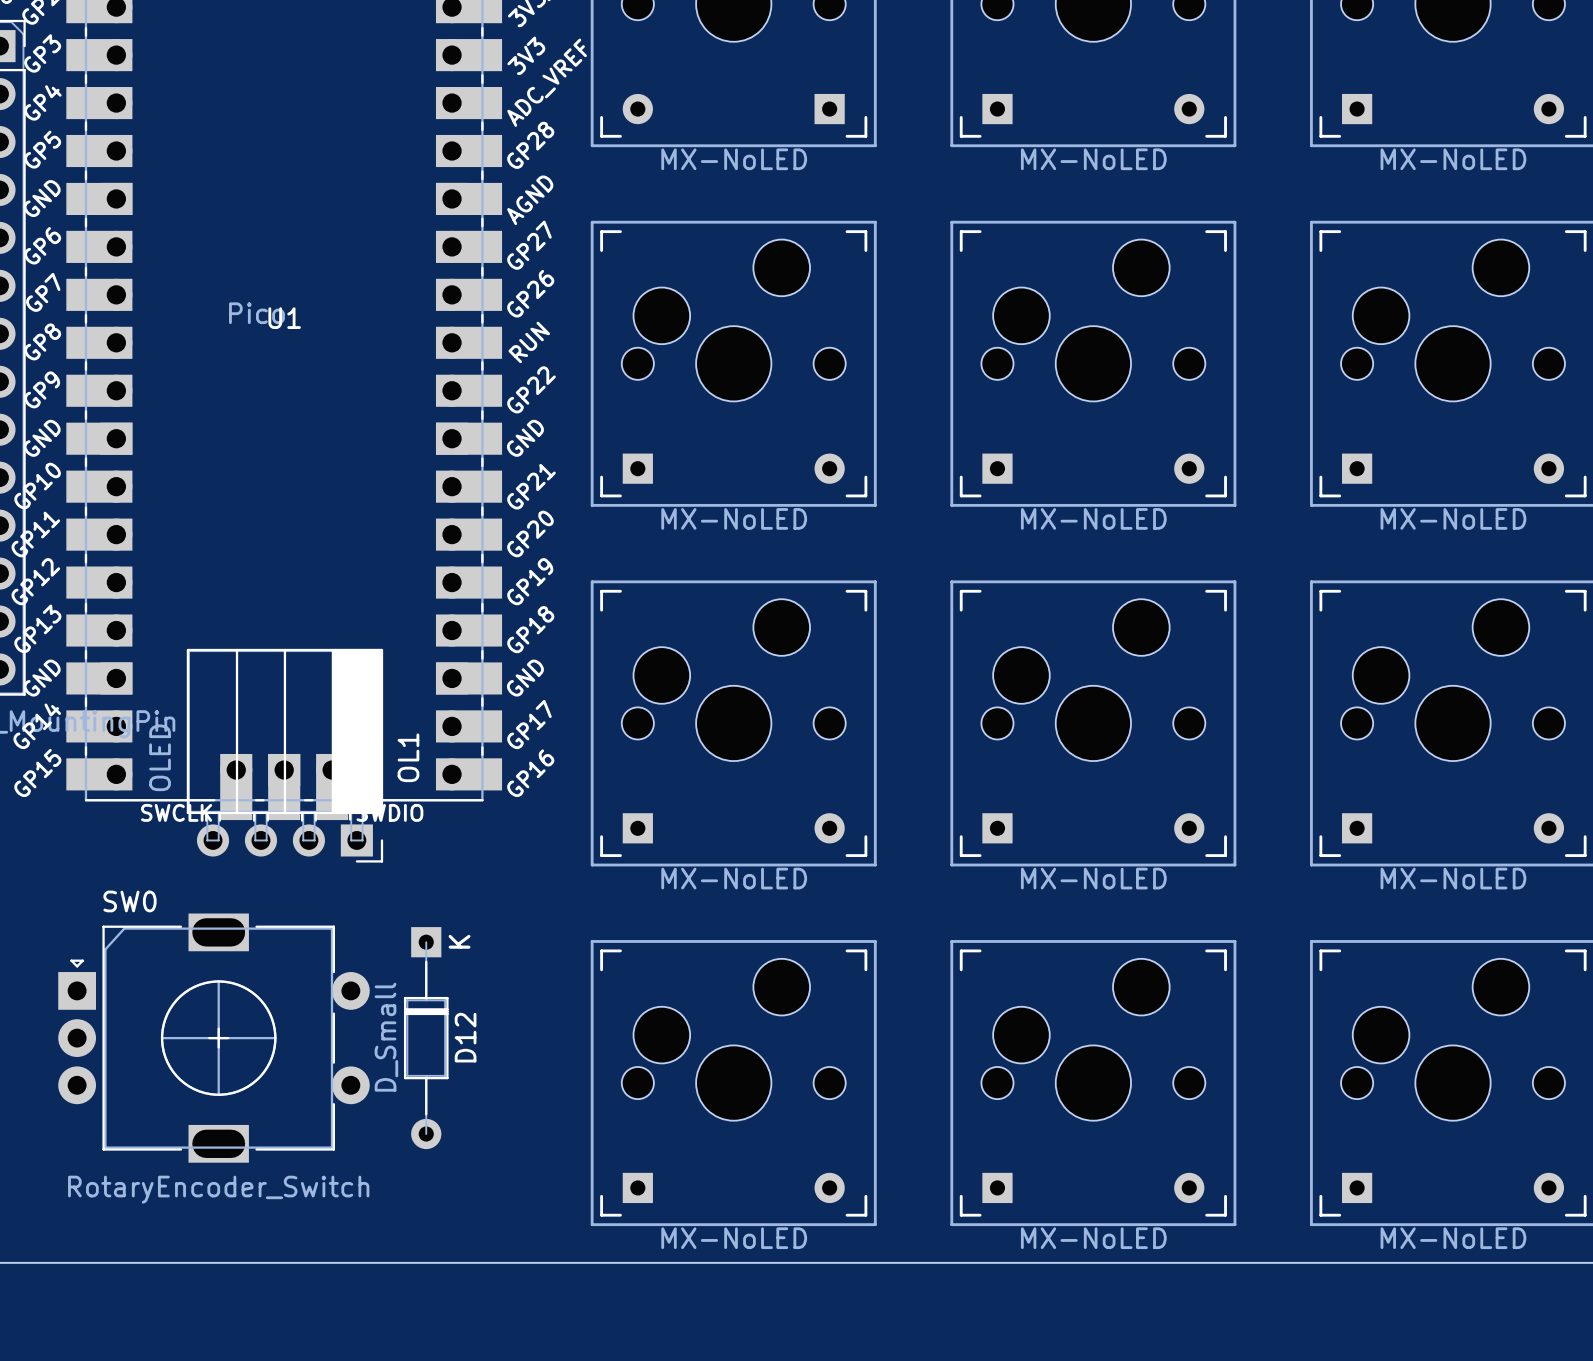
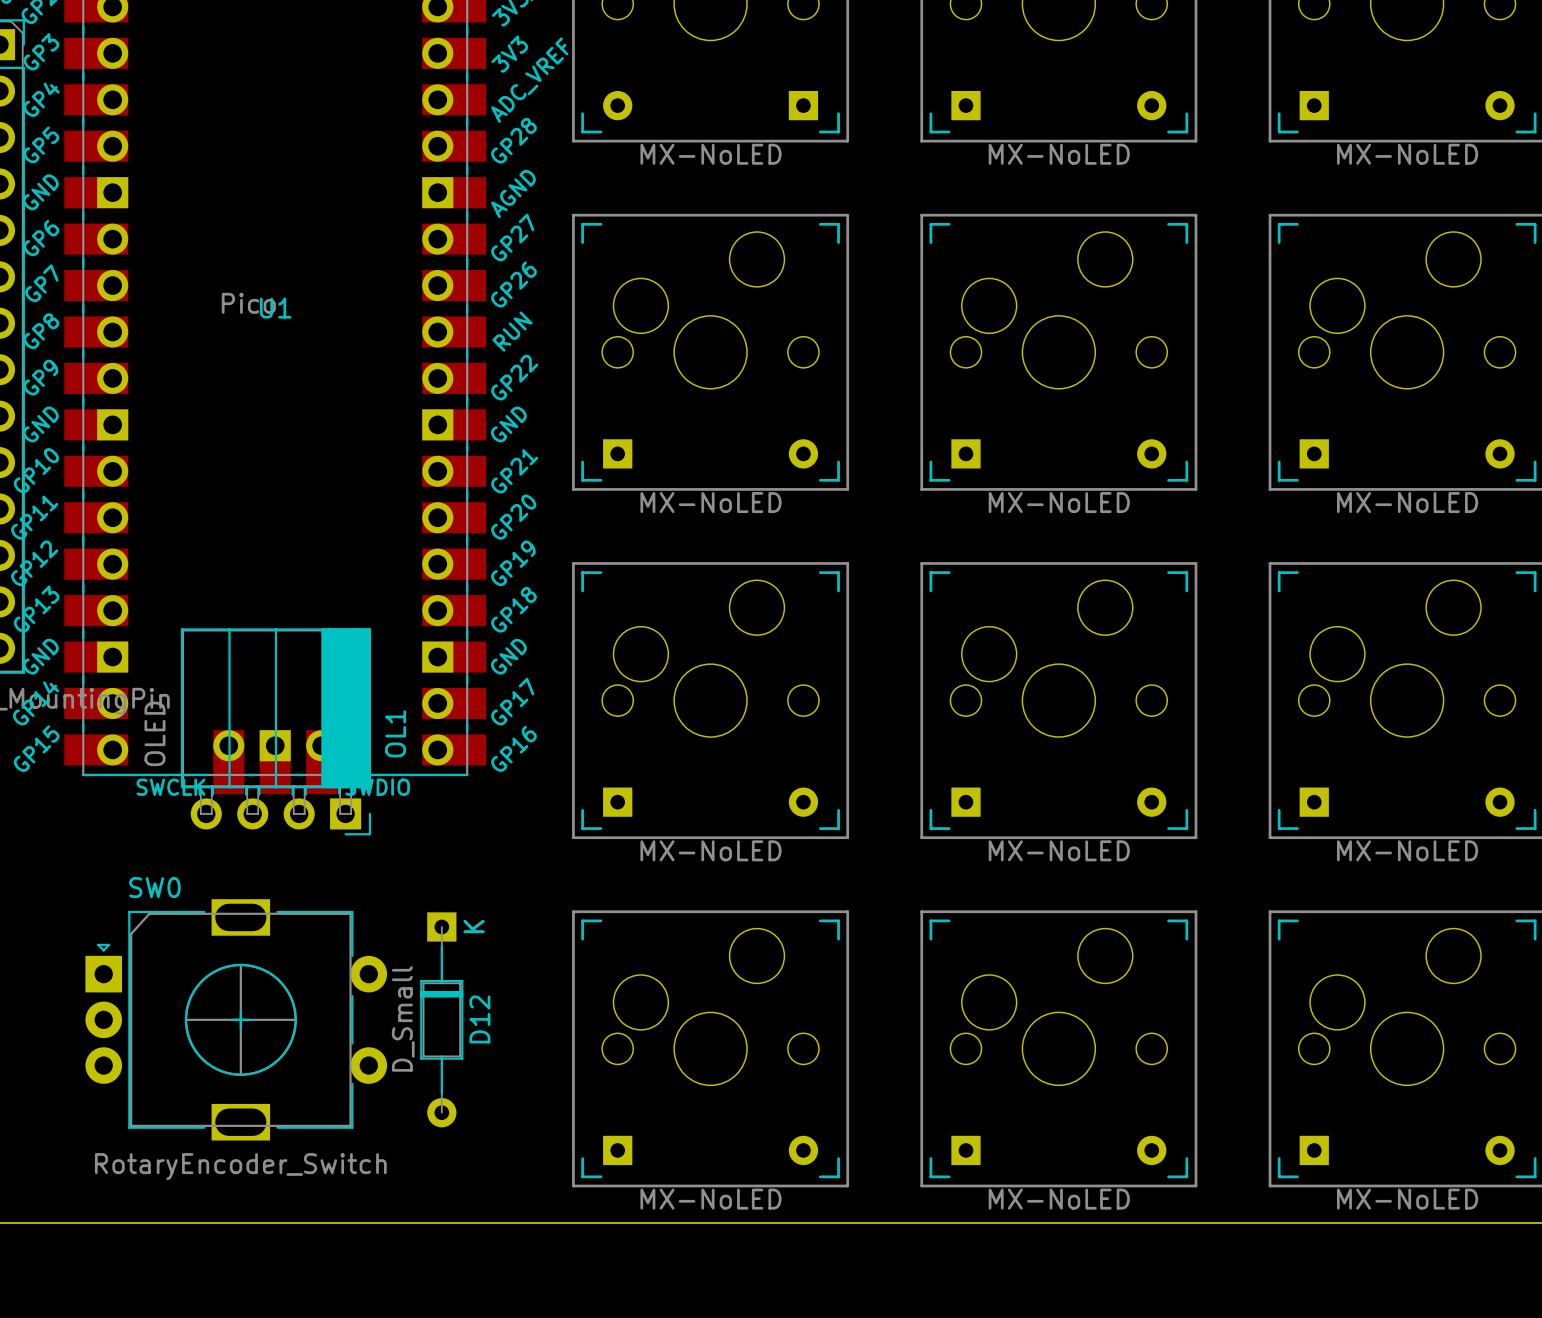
SW0 position: (213, 1038) -> (236, 1019)
D12 position: (426, 1038) -> (441, 1019)

